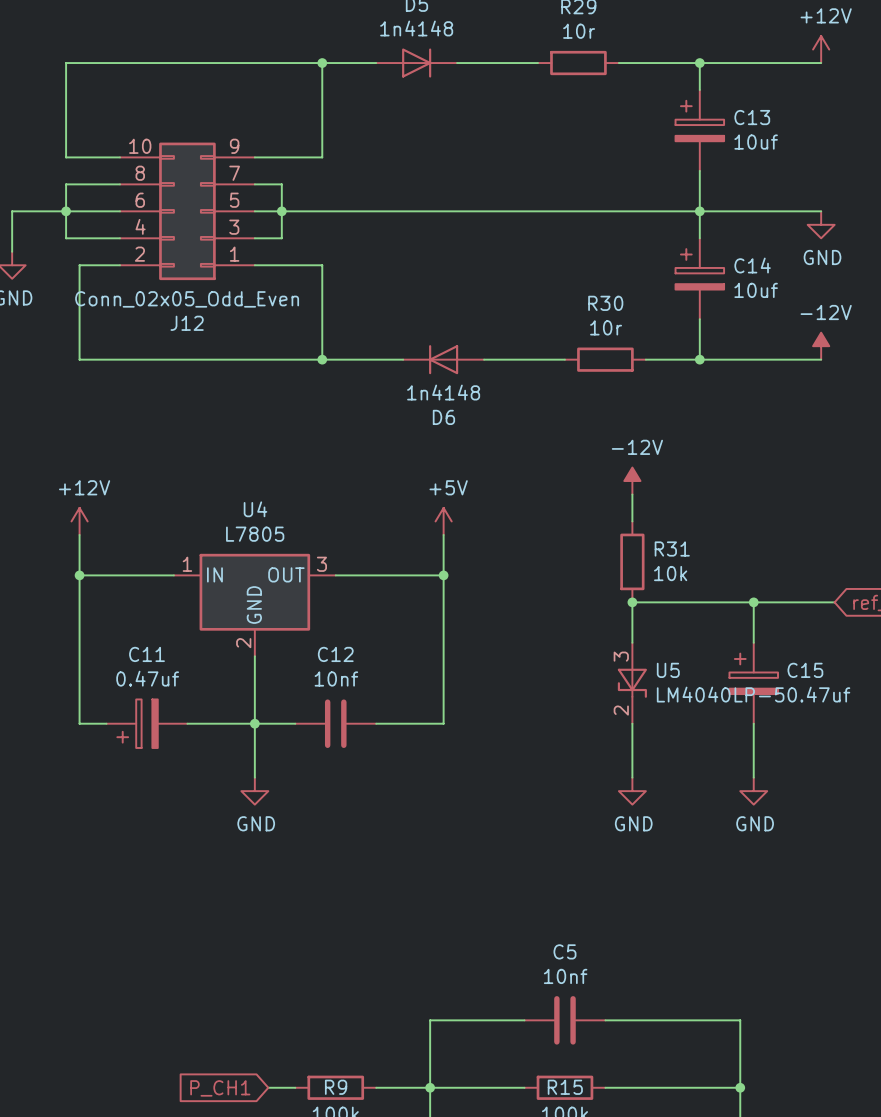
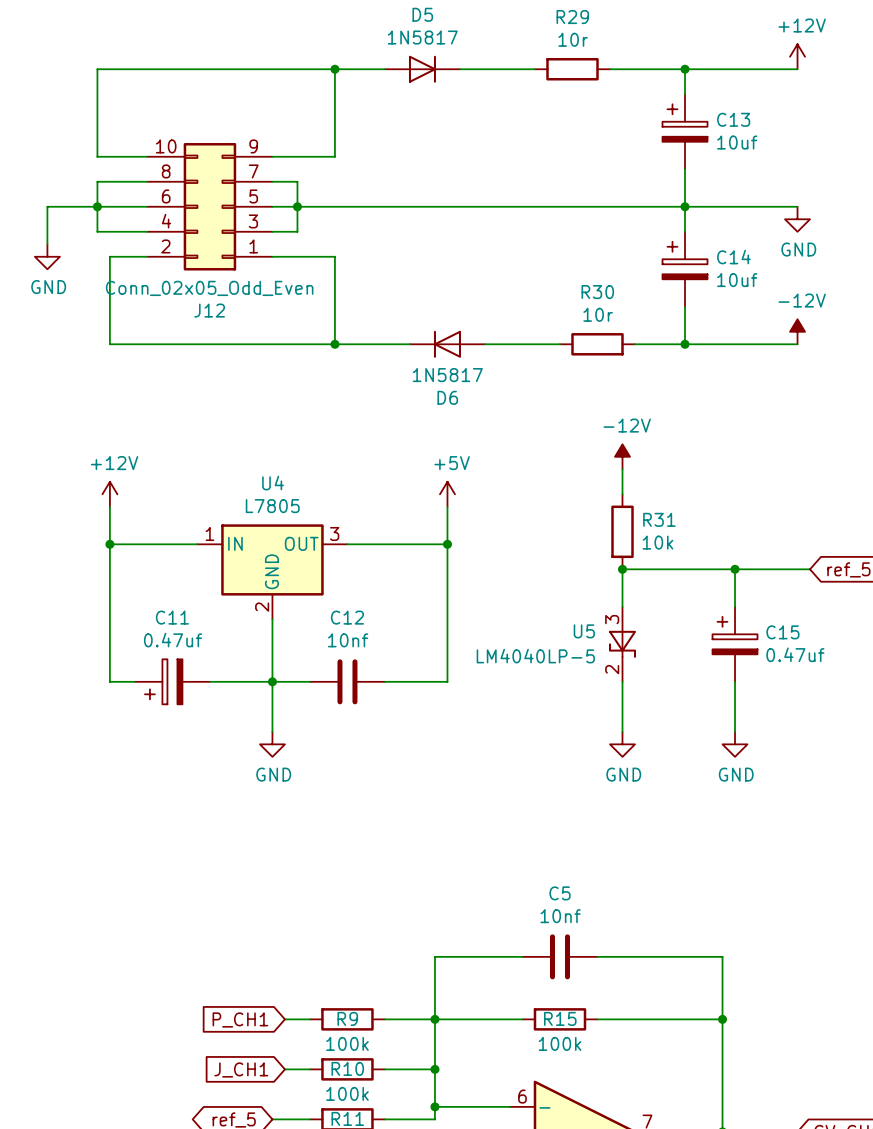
D5 value: 1n4148 (416, 28) -> 1N5817 (422, 37)
D6 value: 1n4148 (443, 392) -> 1N5817 (447, 375)
U5 name position: U5 (668, 670) -> U5 (584, 631)
U5 value position: LM4040LP-5 (720, 694) -> LM4040LP-5 (535, 656)

